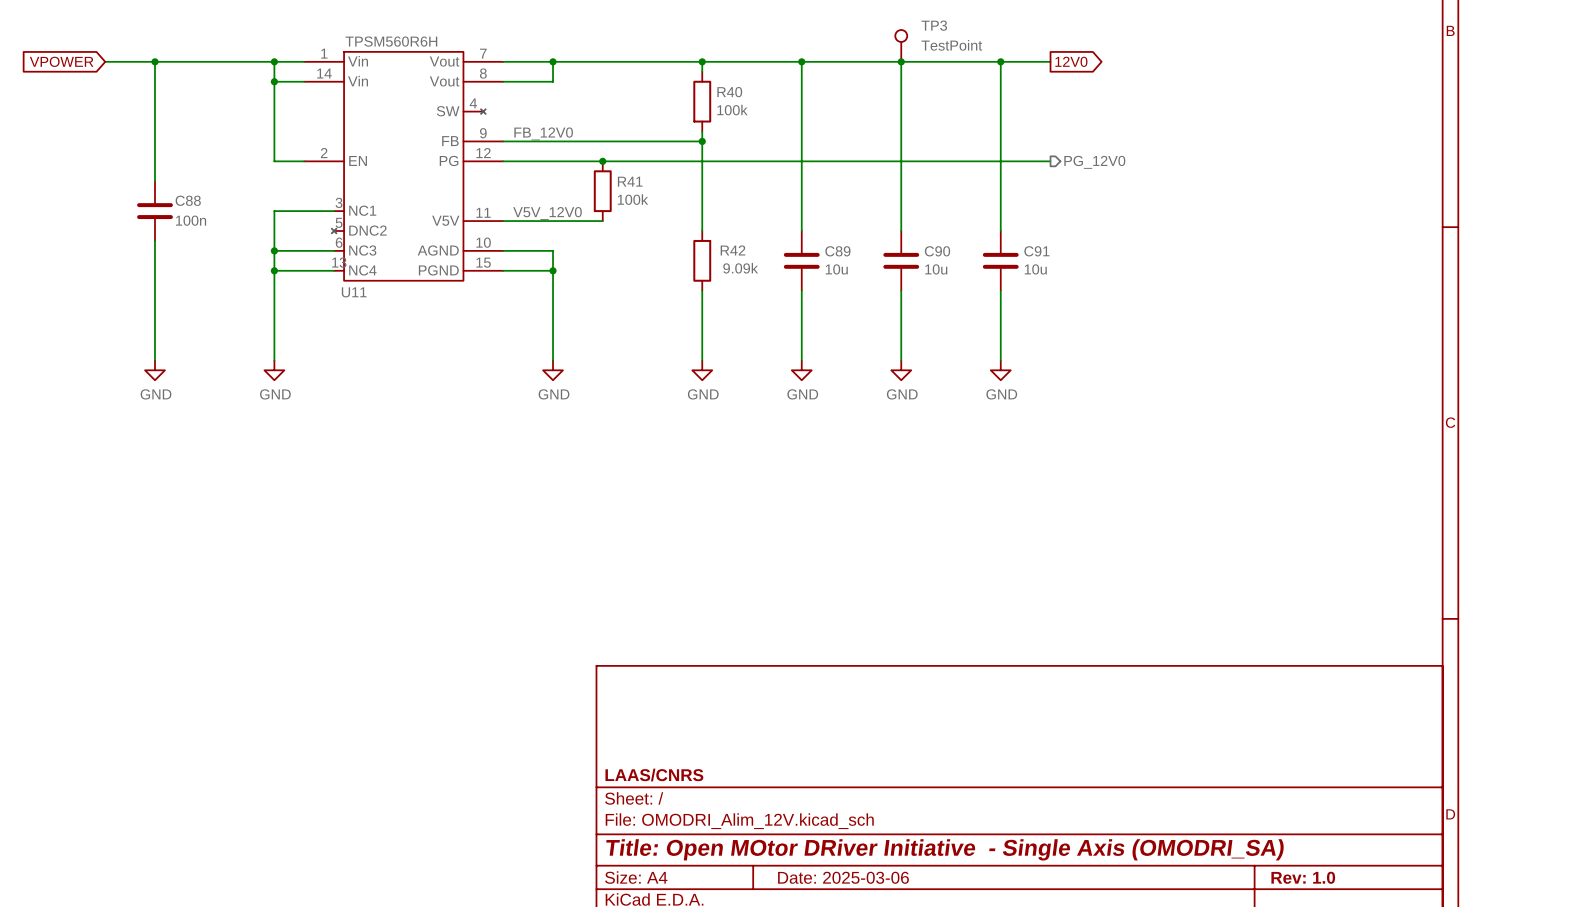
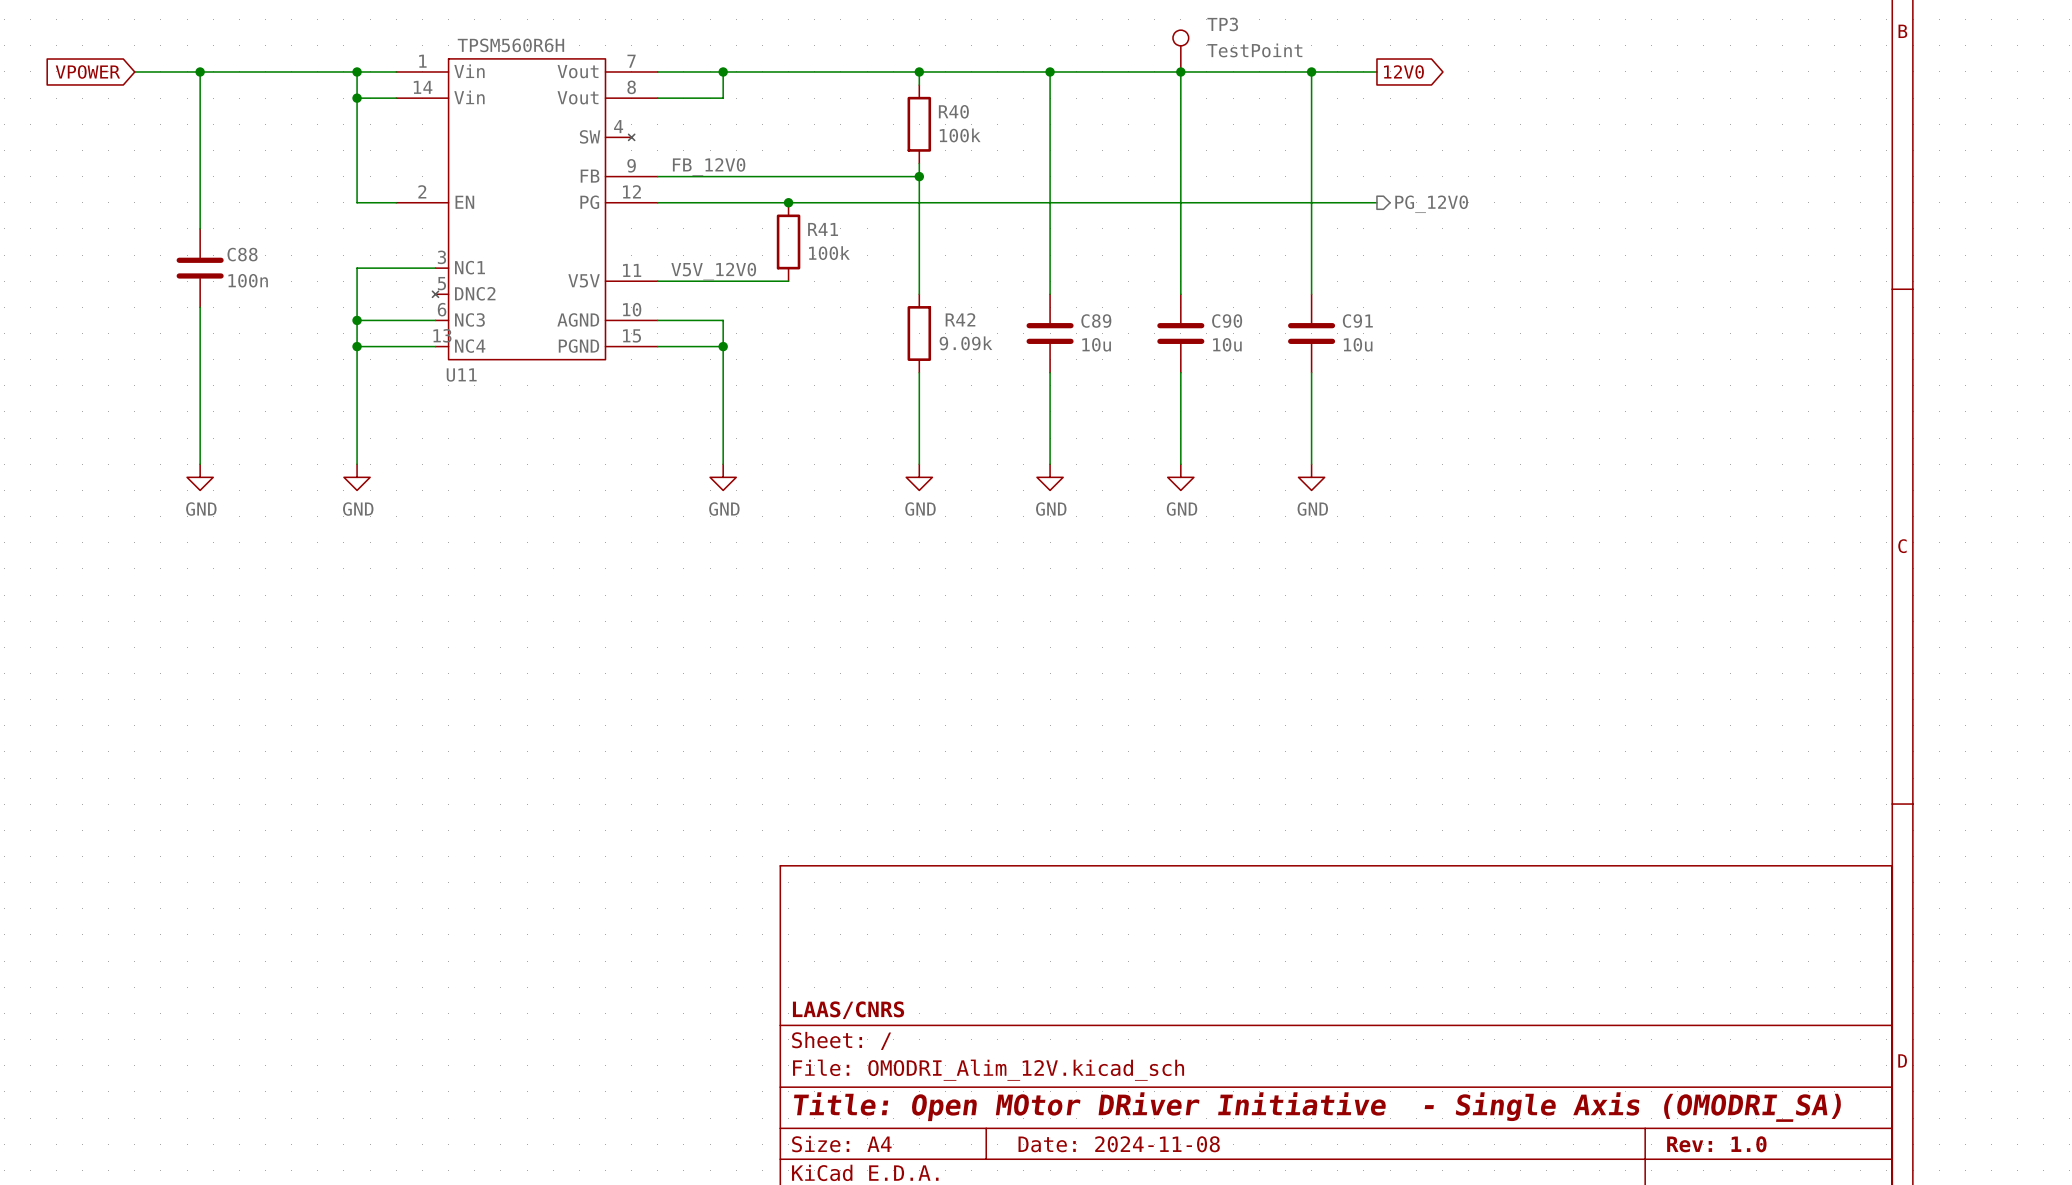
title block: Date: 2025-03-06 (843, 877) -> Date: 2024-11-08 (1119, 1144)

